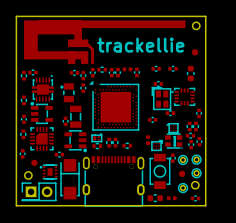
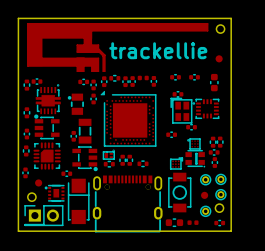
part: (199, 113) -> none
part: (147, 140) -> none
part: (199, 141) -> none
part: (172, 158) -> none

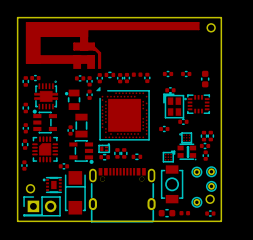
text: trackellie (158, 50) -> none
part: (219, 58) -> none
part: (38, 182) -> none
part: (204, 195) -> none

